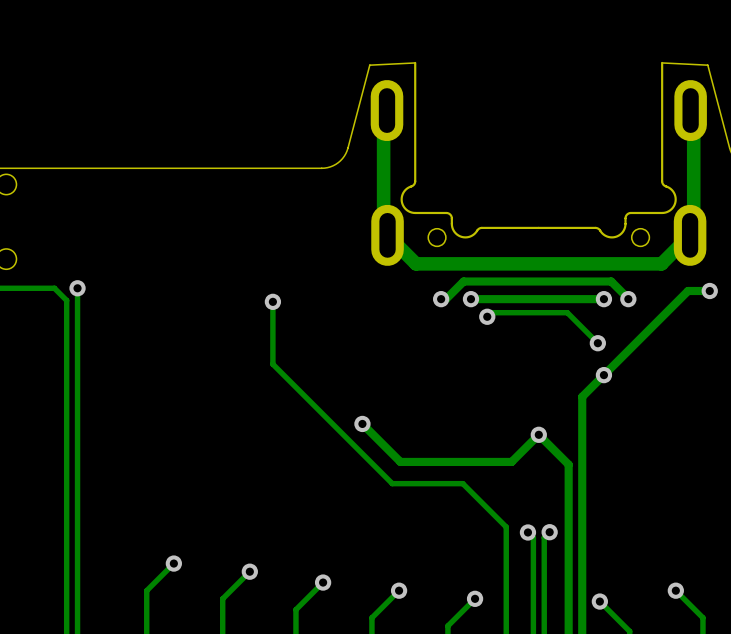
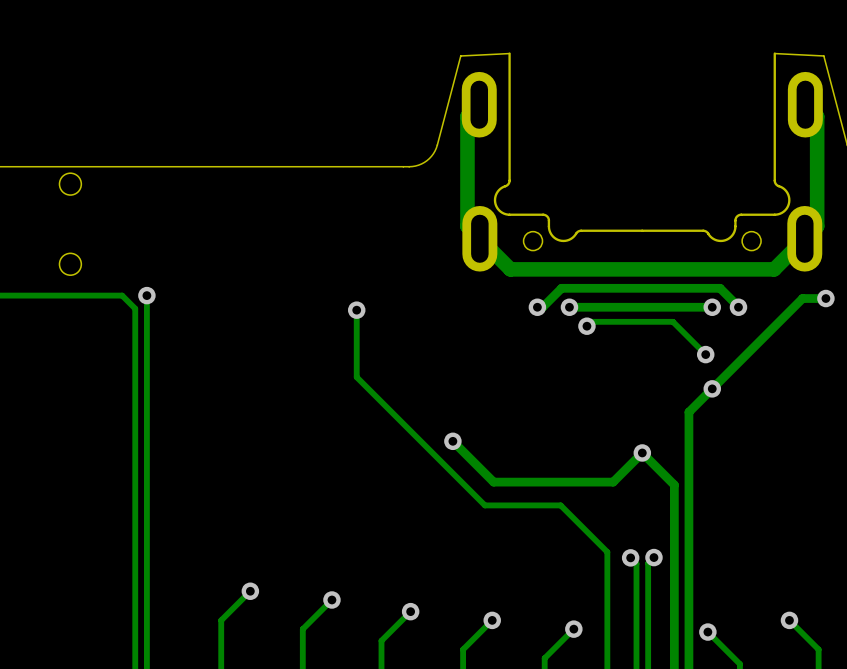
track: (387, 110) (383, 113) (383, 231) (387, 235) -> none
track: (690, 110) (693, 113) (693, 231) (690, 235) -> none
track: none -> (475, 108) (467, 116) (467, 226) (475, 234)
track: none -> (808, 108) (817, 116) (817, 226) (808, 234)

